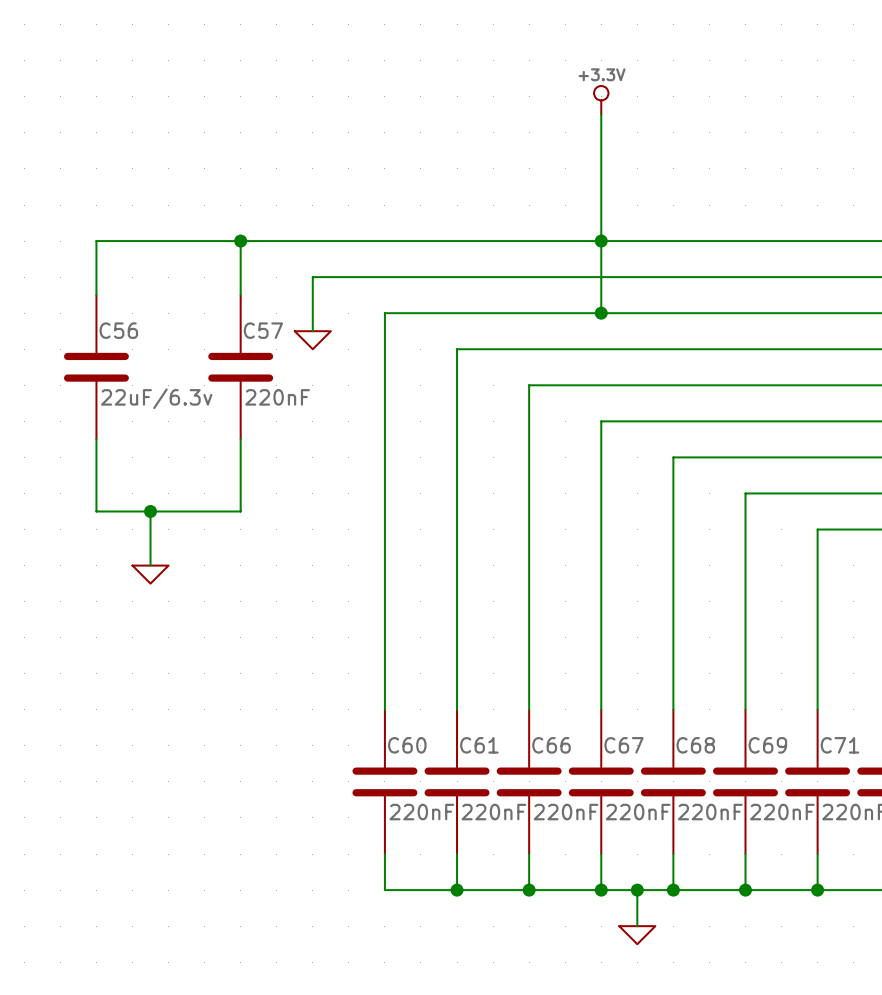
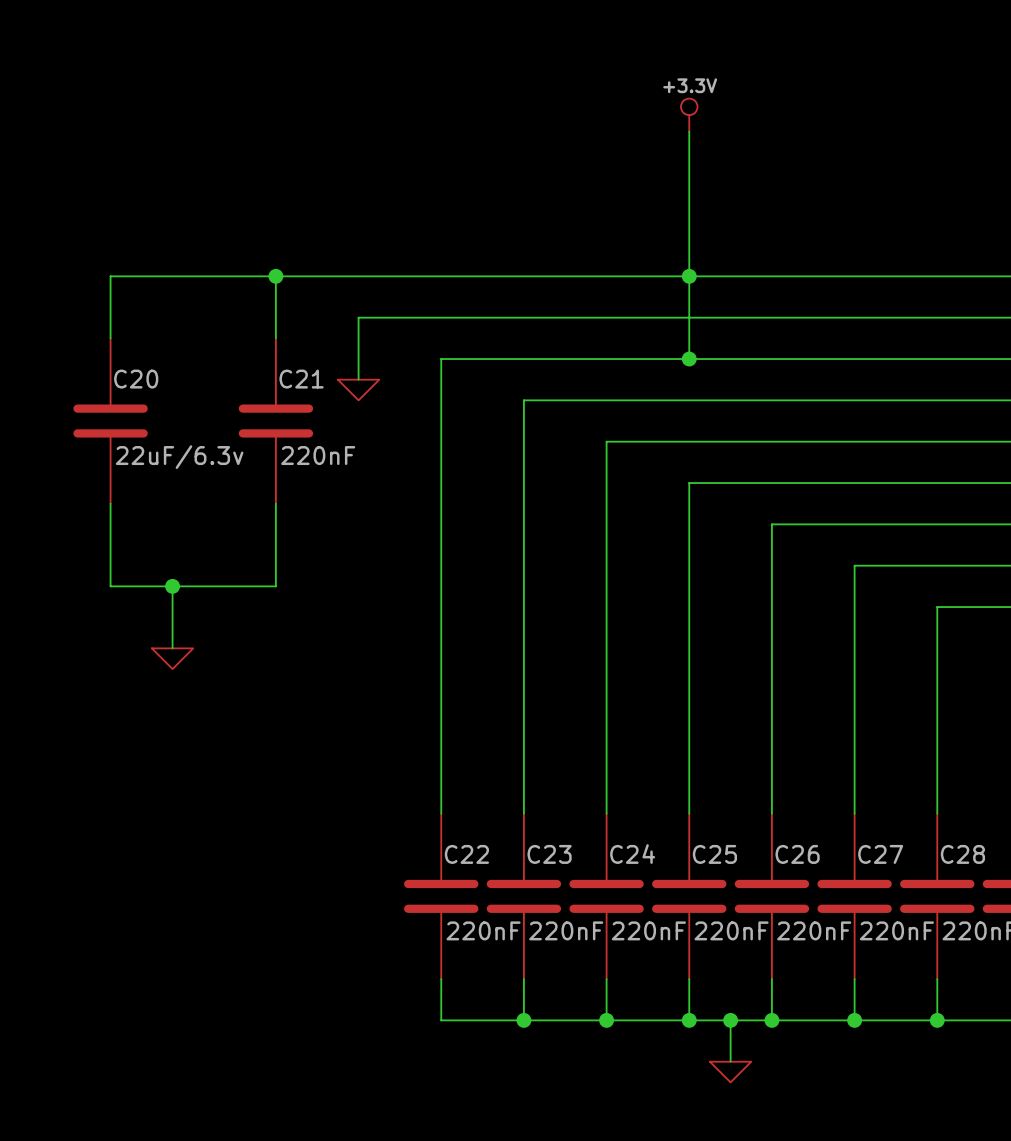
C56 name: C56 (118, 330) -> C20 (136, 379)
C57 name: C57 (263, 330) -> C21 (301, 379)
C60 name: C60 (407, 745) -> C22 (466, 854)
C61 name: C61 (479, 745) -> C23 (549, 854)
C66 name: C66 (551, 745) -> C24 (632, 854)
C67 name: C67 (623, 745) -> C25 (714, 854)
C68 name: C68 (695, 745) -> C26 (797, 854)
C69 name: C69 (767, 745) -> C27 (880, 854)
C71 name: C71 (839, 745) -> C28 (962, 854)

